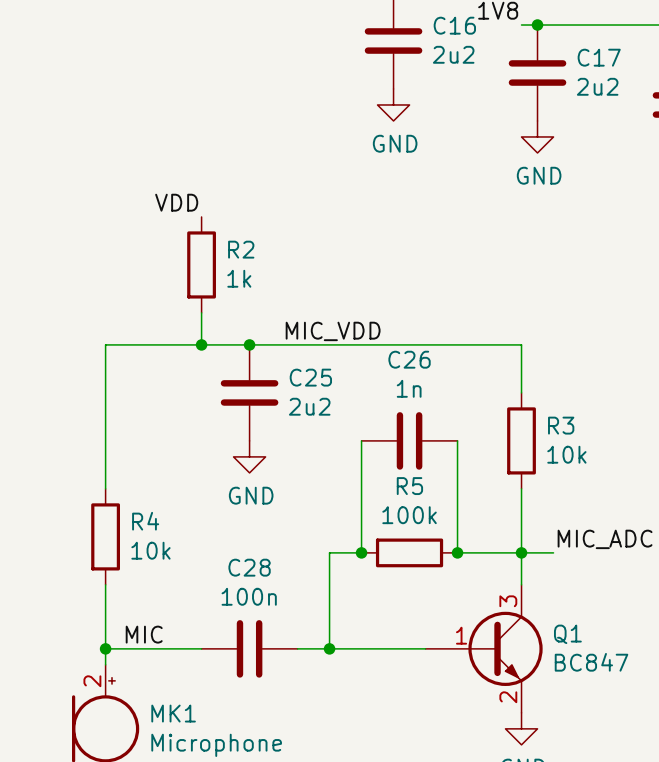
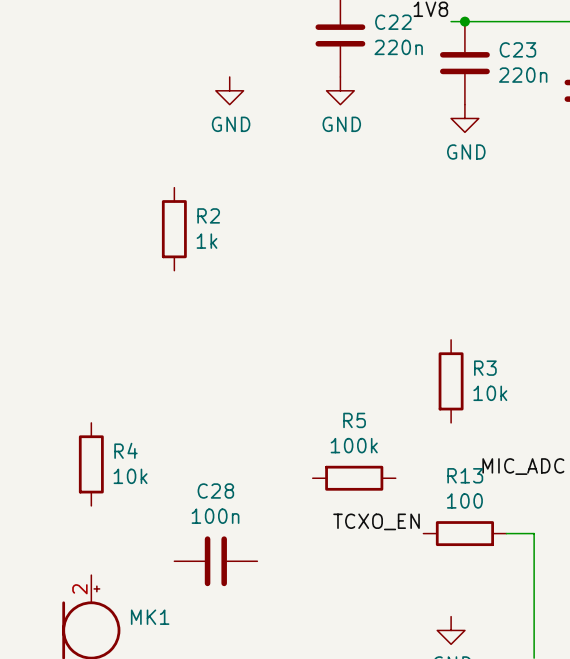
C16 name: C16 (454, 25) -> C22 (393, 22)
C16 value: 2u2 (453, 54) -> 220n (398, 47)
C17 name: C17 (599, 57) -> C23 (517, 49)
C17 value: 2u2 (597, 86) -> 220n (523, 75)
power symbol: none -> GND (229, 90)
label: VDD (176, 202) -> none
wire: (201, 312) (201, 344) -> none
label: MIC_VDD (333, 331) -> none
junction: (201, 344) -> none
junction: (249, 344) -> none
C25: 2u2 (249, 392) -> none
wire: (521, 392) (521, 344) (105, 344) (105, 488) -> none
wire: (361, 440) (361, 552) (329, 552) (329, 648) -> none
C26: 1n (409, 440) -> none
wire: (457, 440) (457, 552) (553, 552) -> none
power symbol: GND (249, 456) -> none
wire: (521, 488) (521, 584) -> none
junction: (361, 552) -> none
junction: (457, 552) -> none
junction: (521, 552) -> none
wire: (105, 584) (105, 664) -> none
label: none -> TCXO_EN (376, 521)
R13: none -> 100 (464, 533)
wire: none -> (506, 533) (534, 533) (534, 658)
label: MIC (144, 634) -> none
wire: (105, 648) (201, 648) -> none
junction: (105, 648) -> none
wire: (297, 648) (425, 648) -> none
junction: (329, 648) -> none
Q1: BC847 (484, 648) -> none
MK1 value: Microphone (216, 745) -> none

